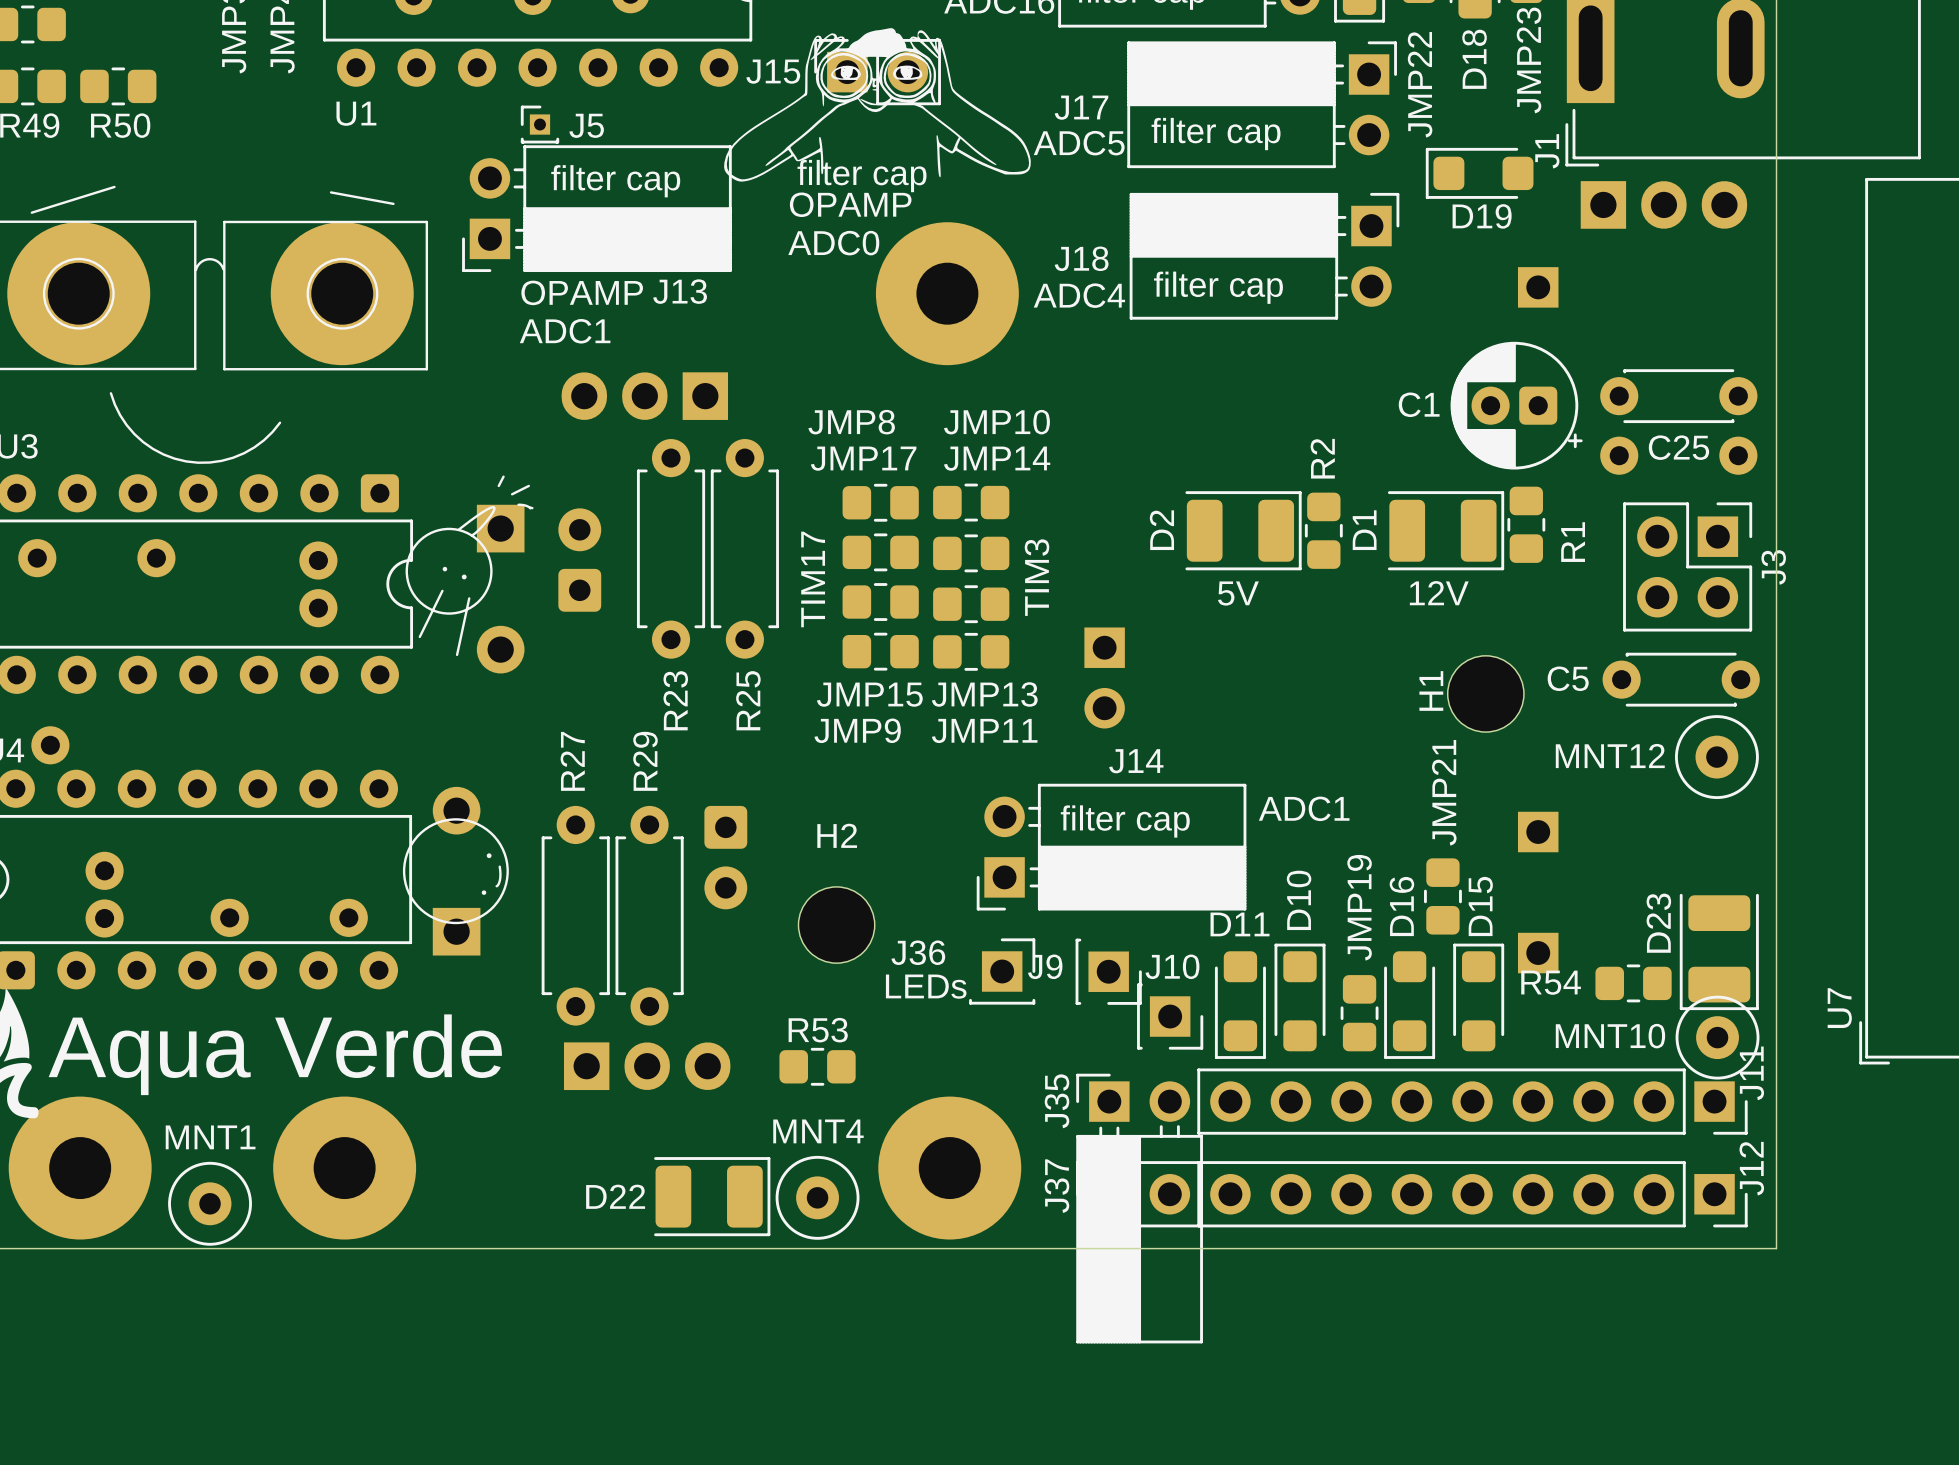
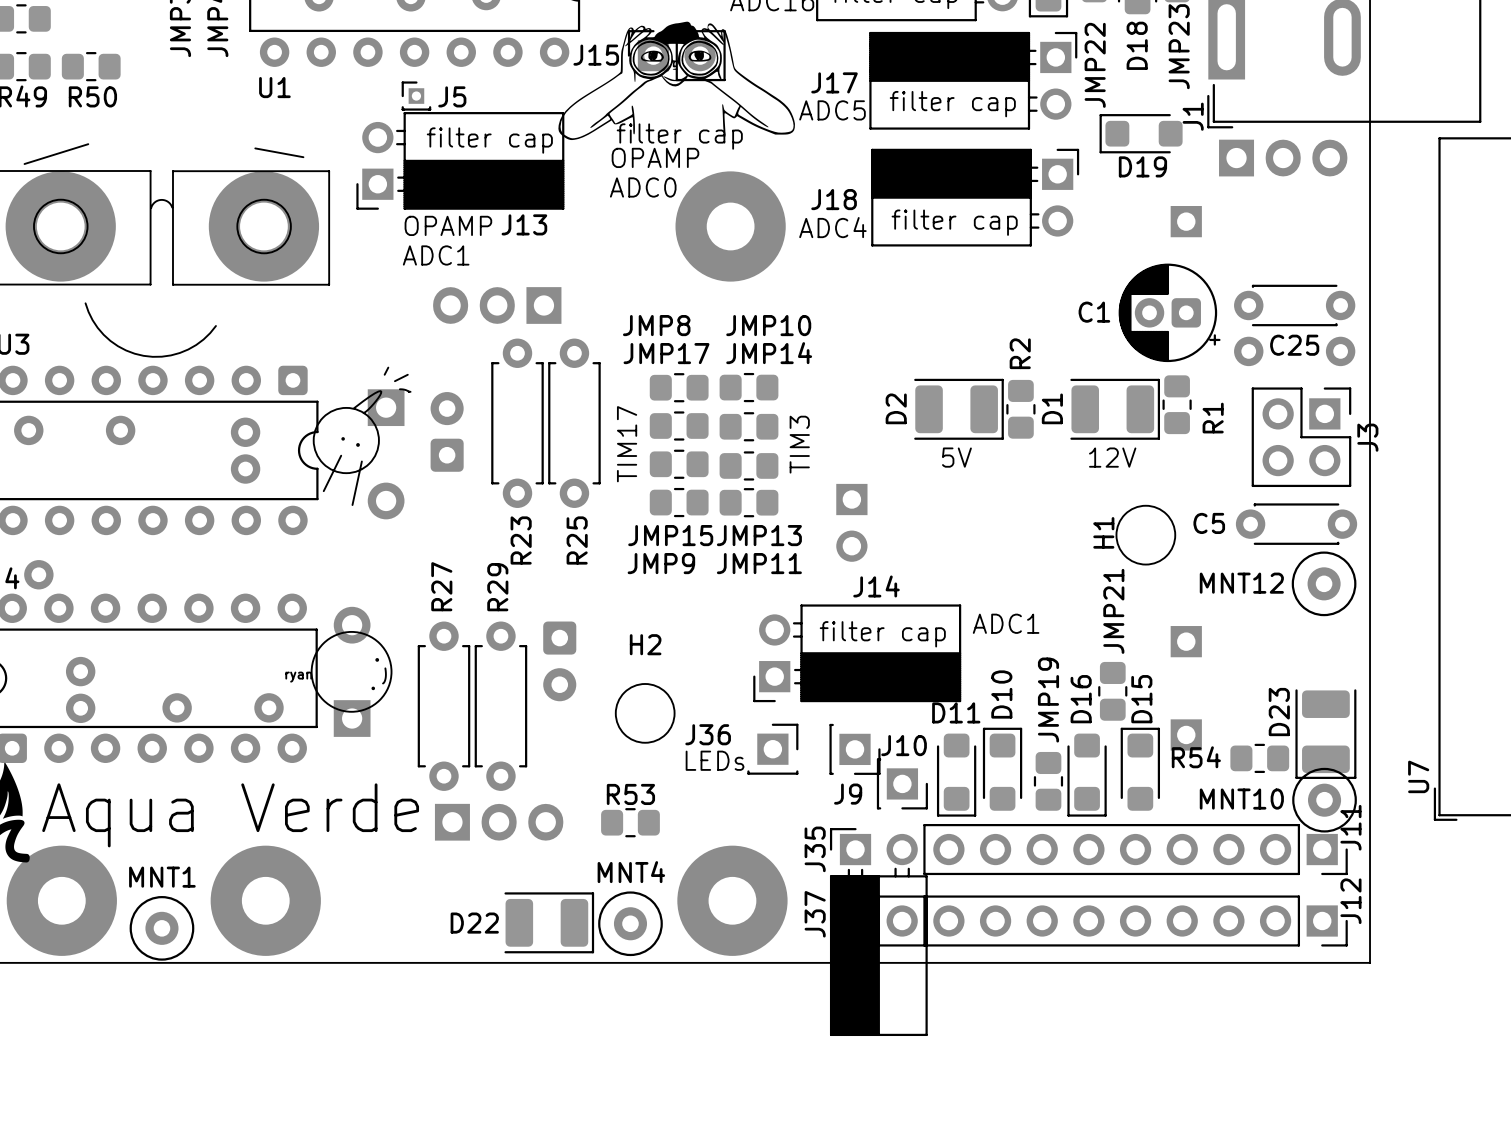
text: none -> ryan (298, 677)
J9 name position: J9 (1045, 966) -> J9 (848, 794)

